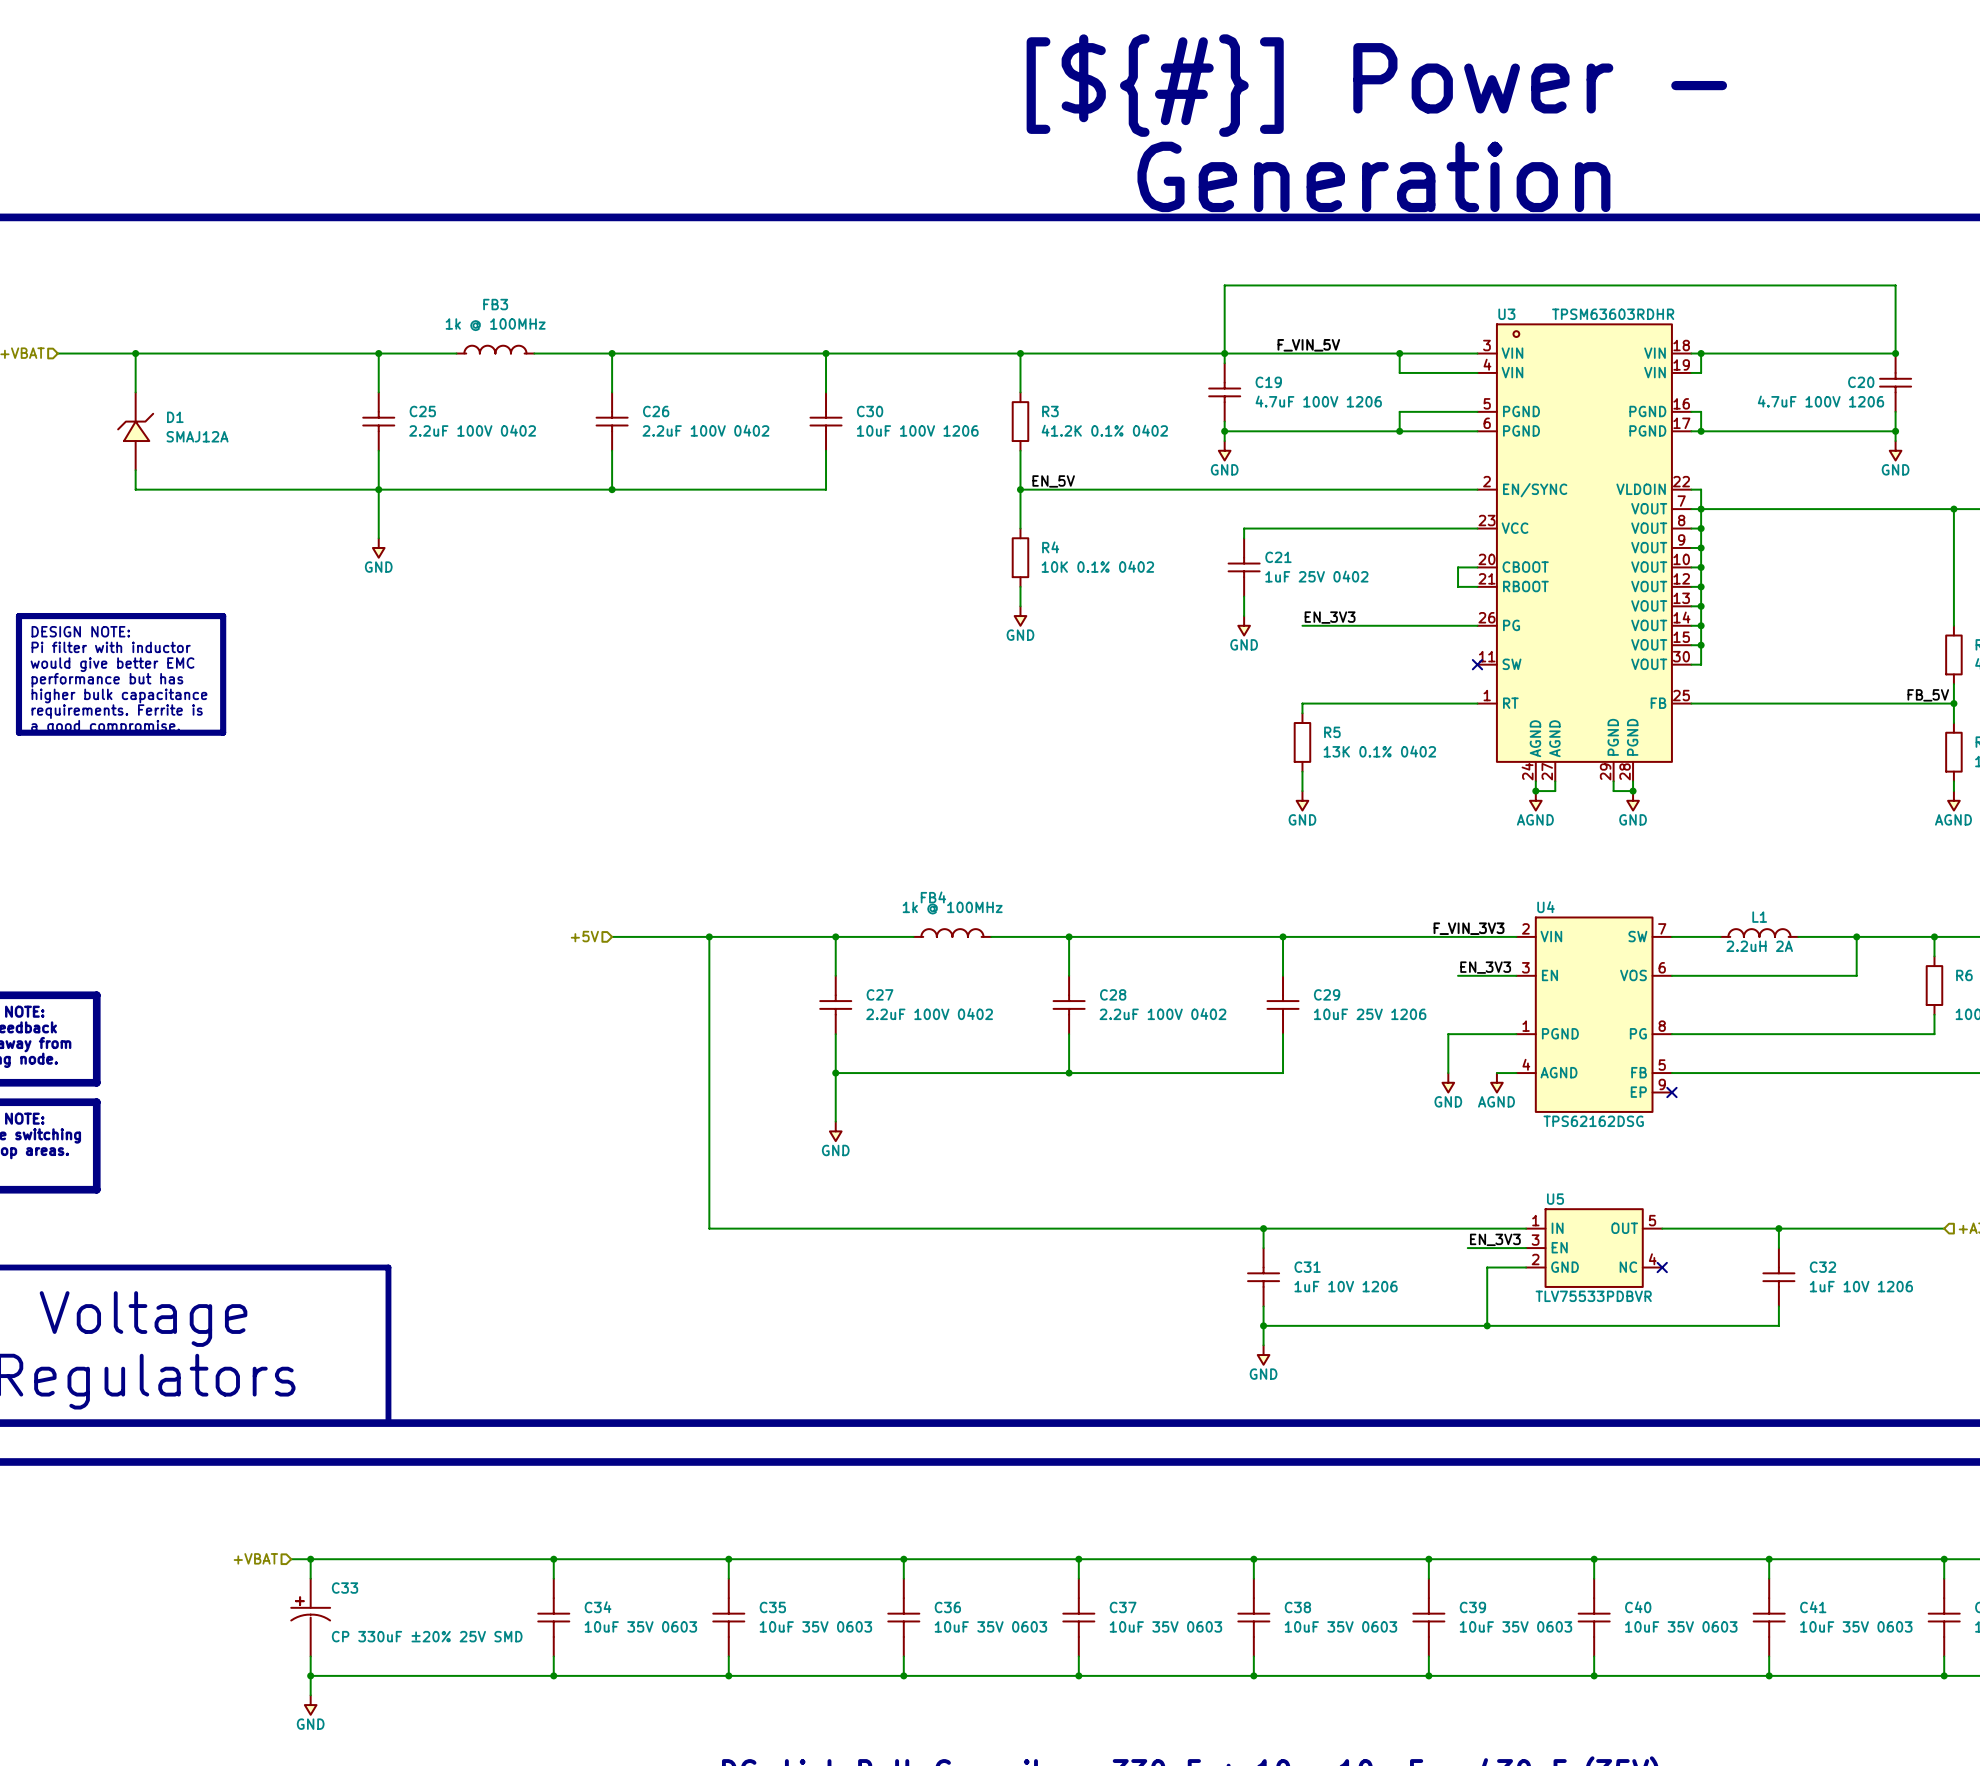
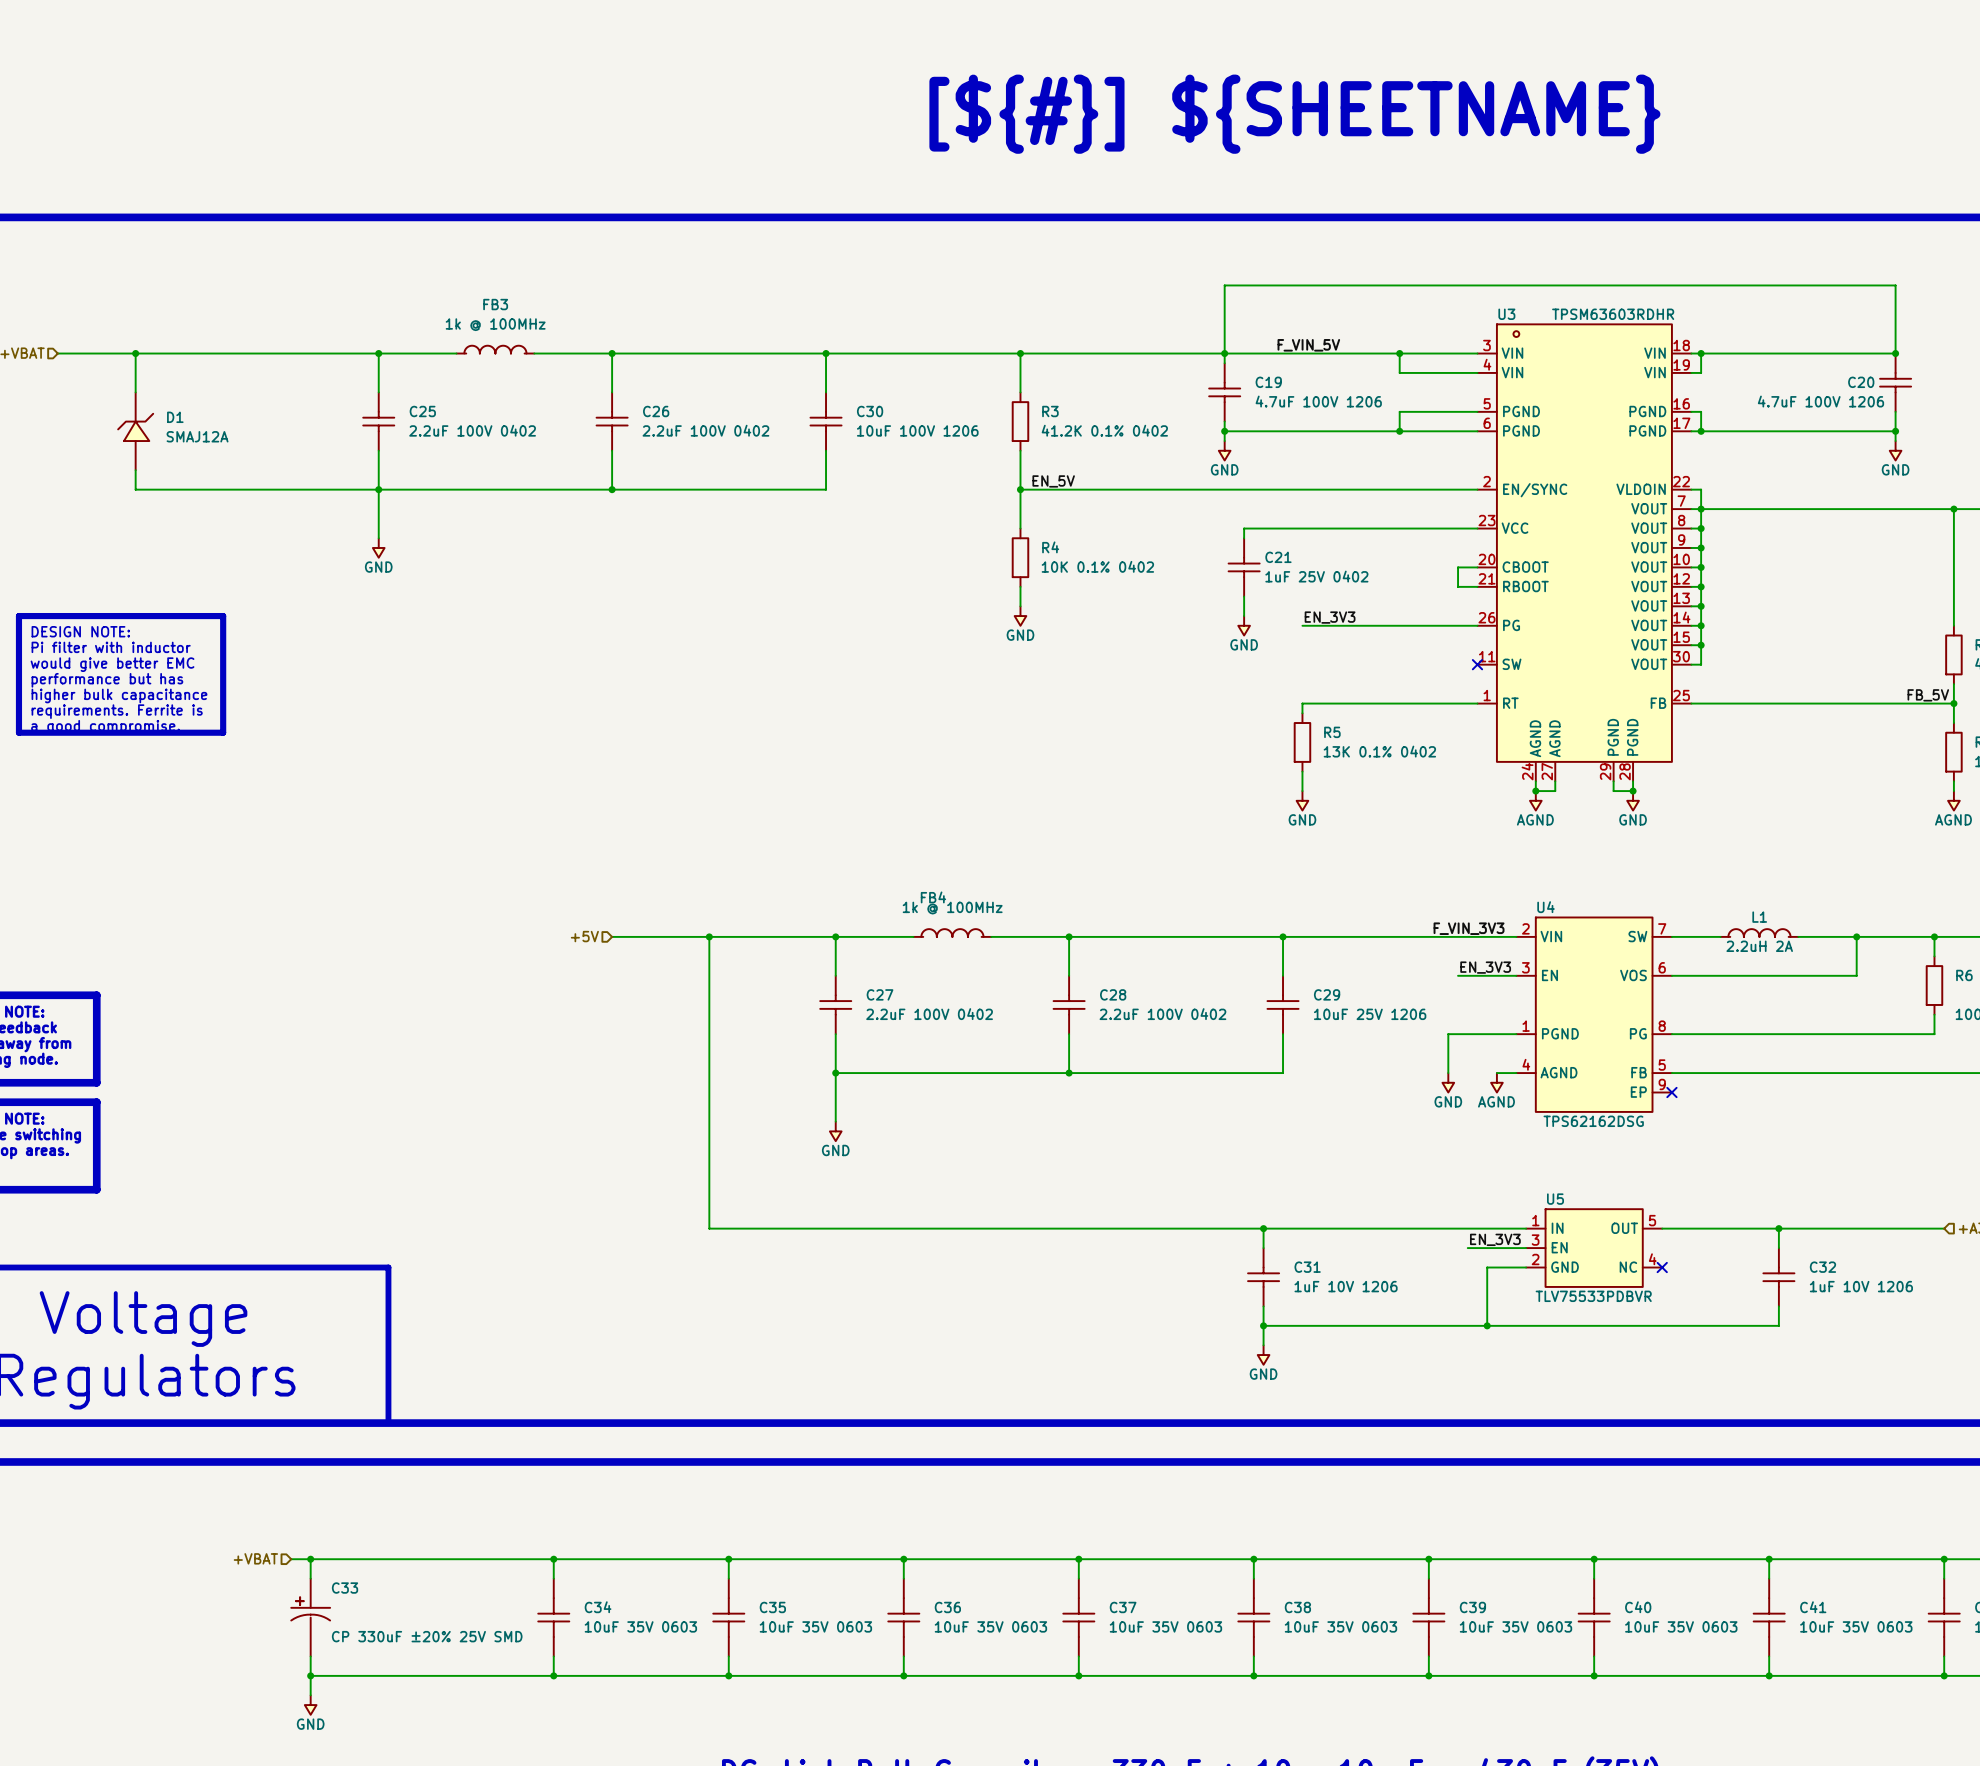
text: [${#}] Power - (1376, 85) -> none
text: none -> [${#}] ${SHEETNAME} (1294, 114)
text: Generation (1373, 176) -> none

